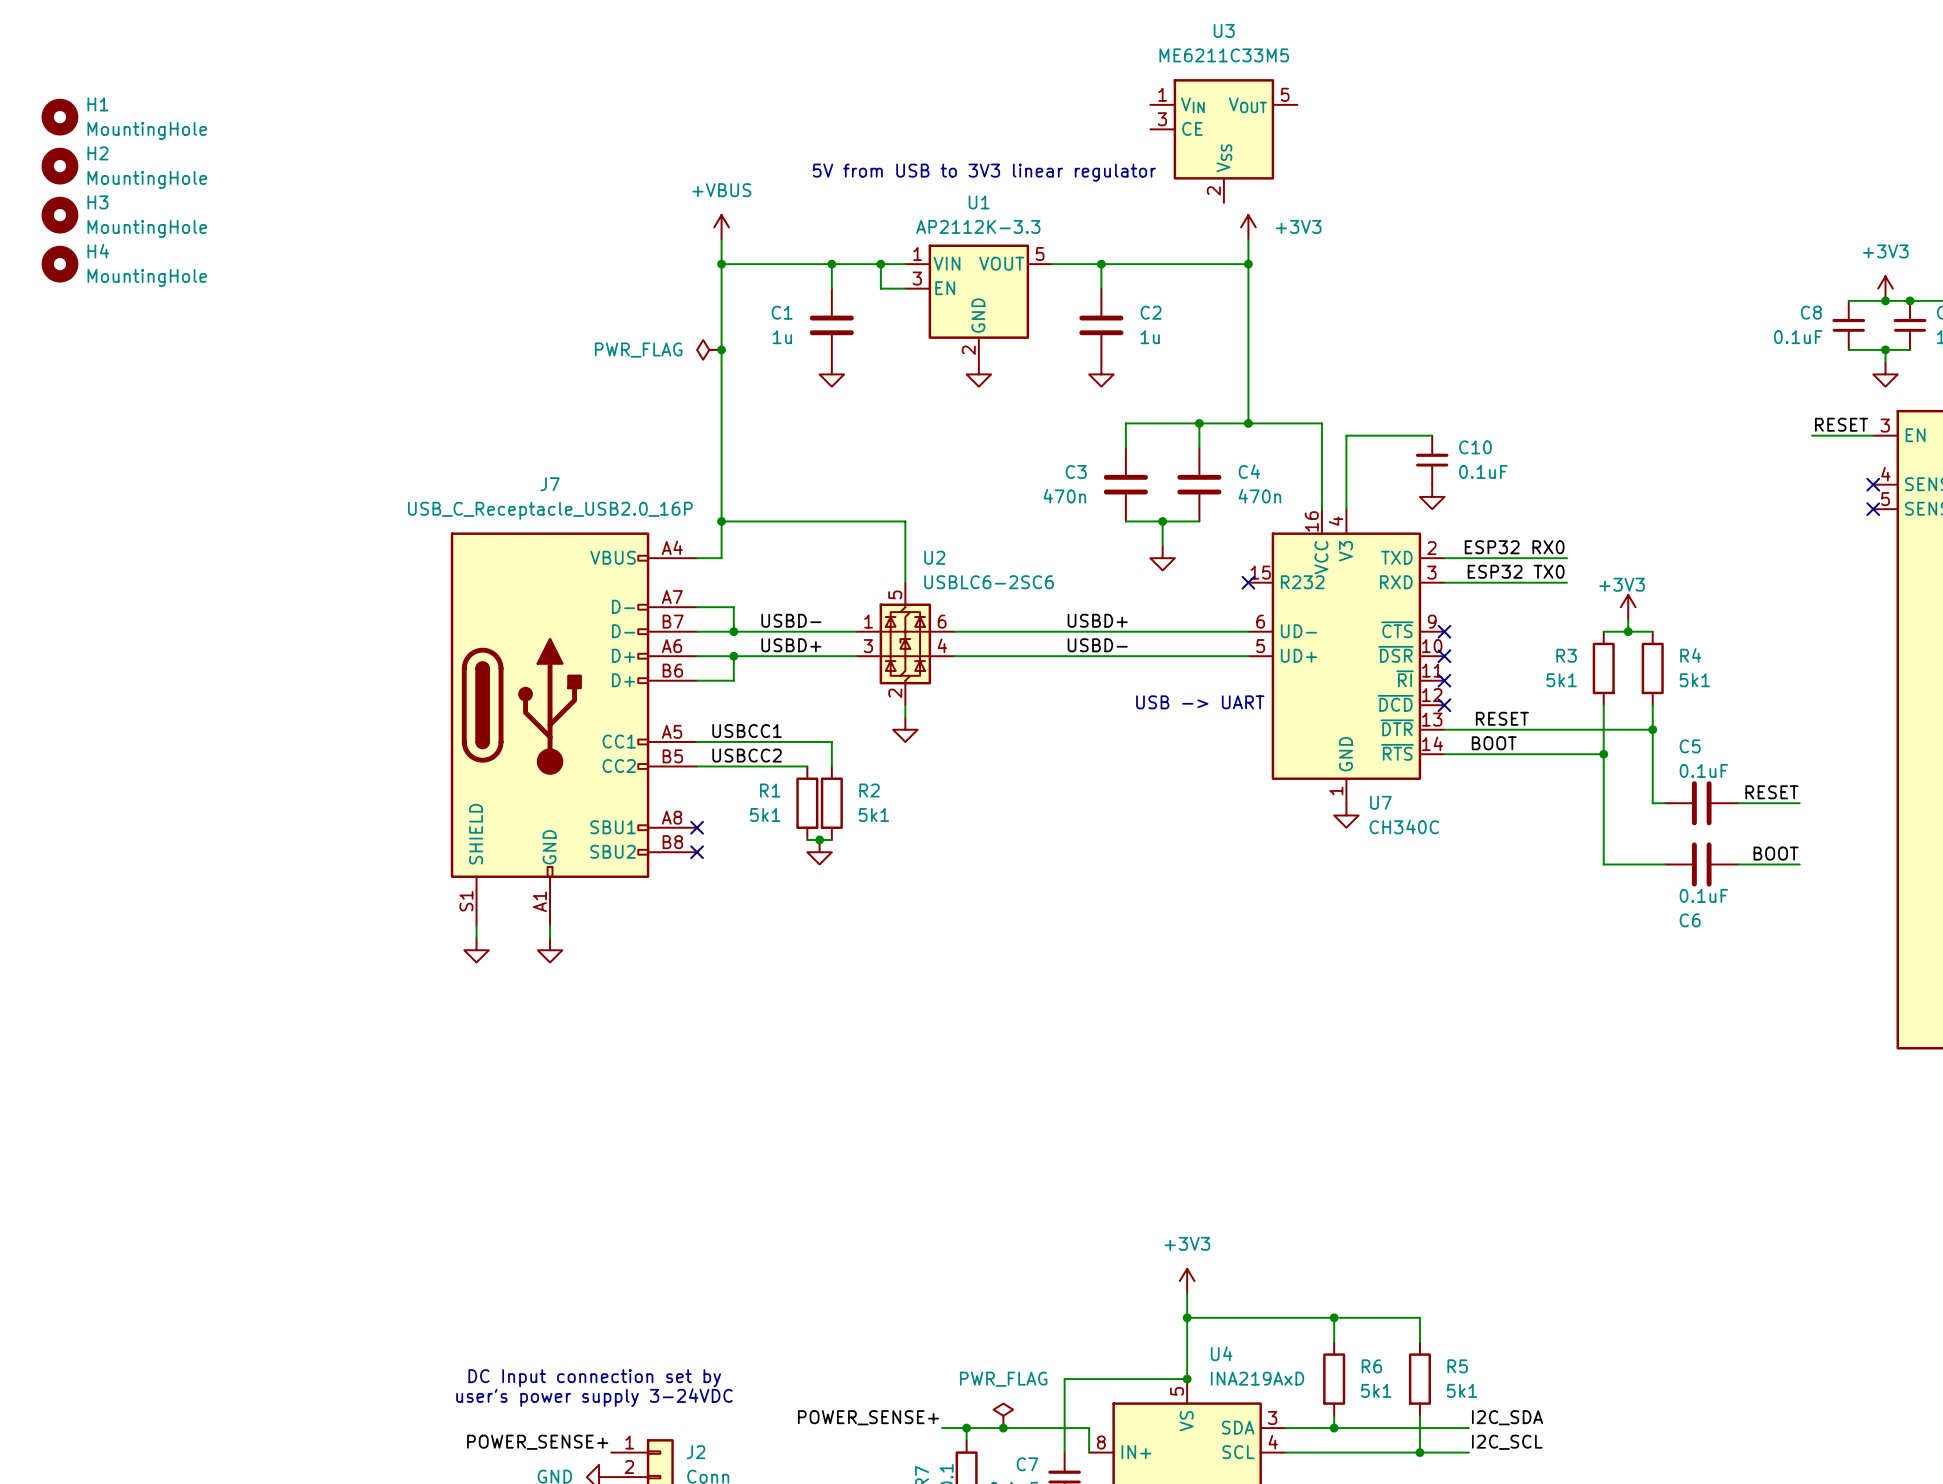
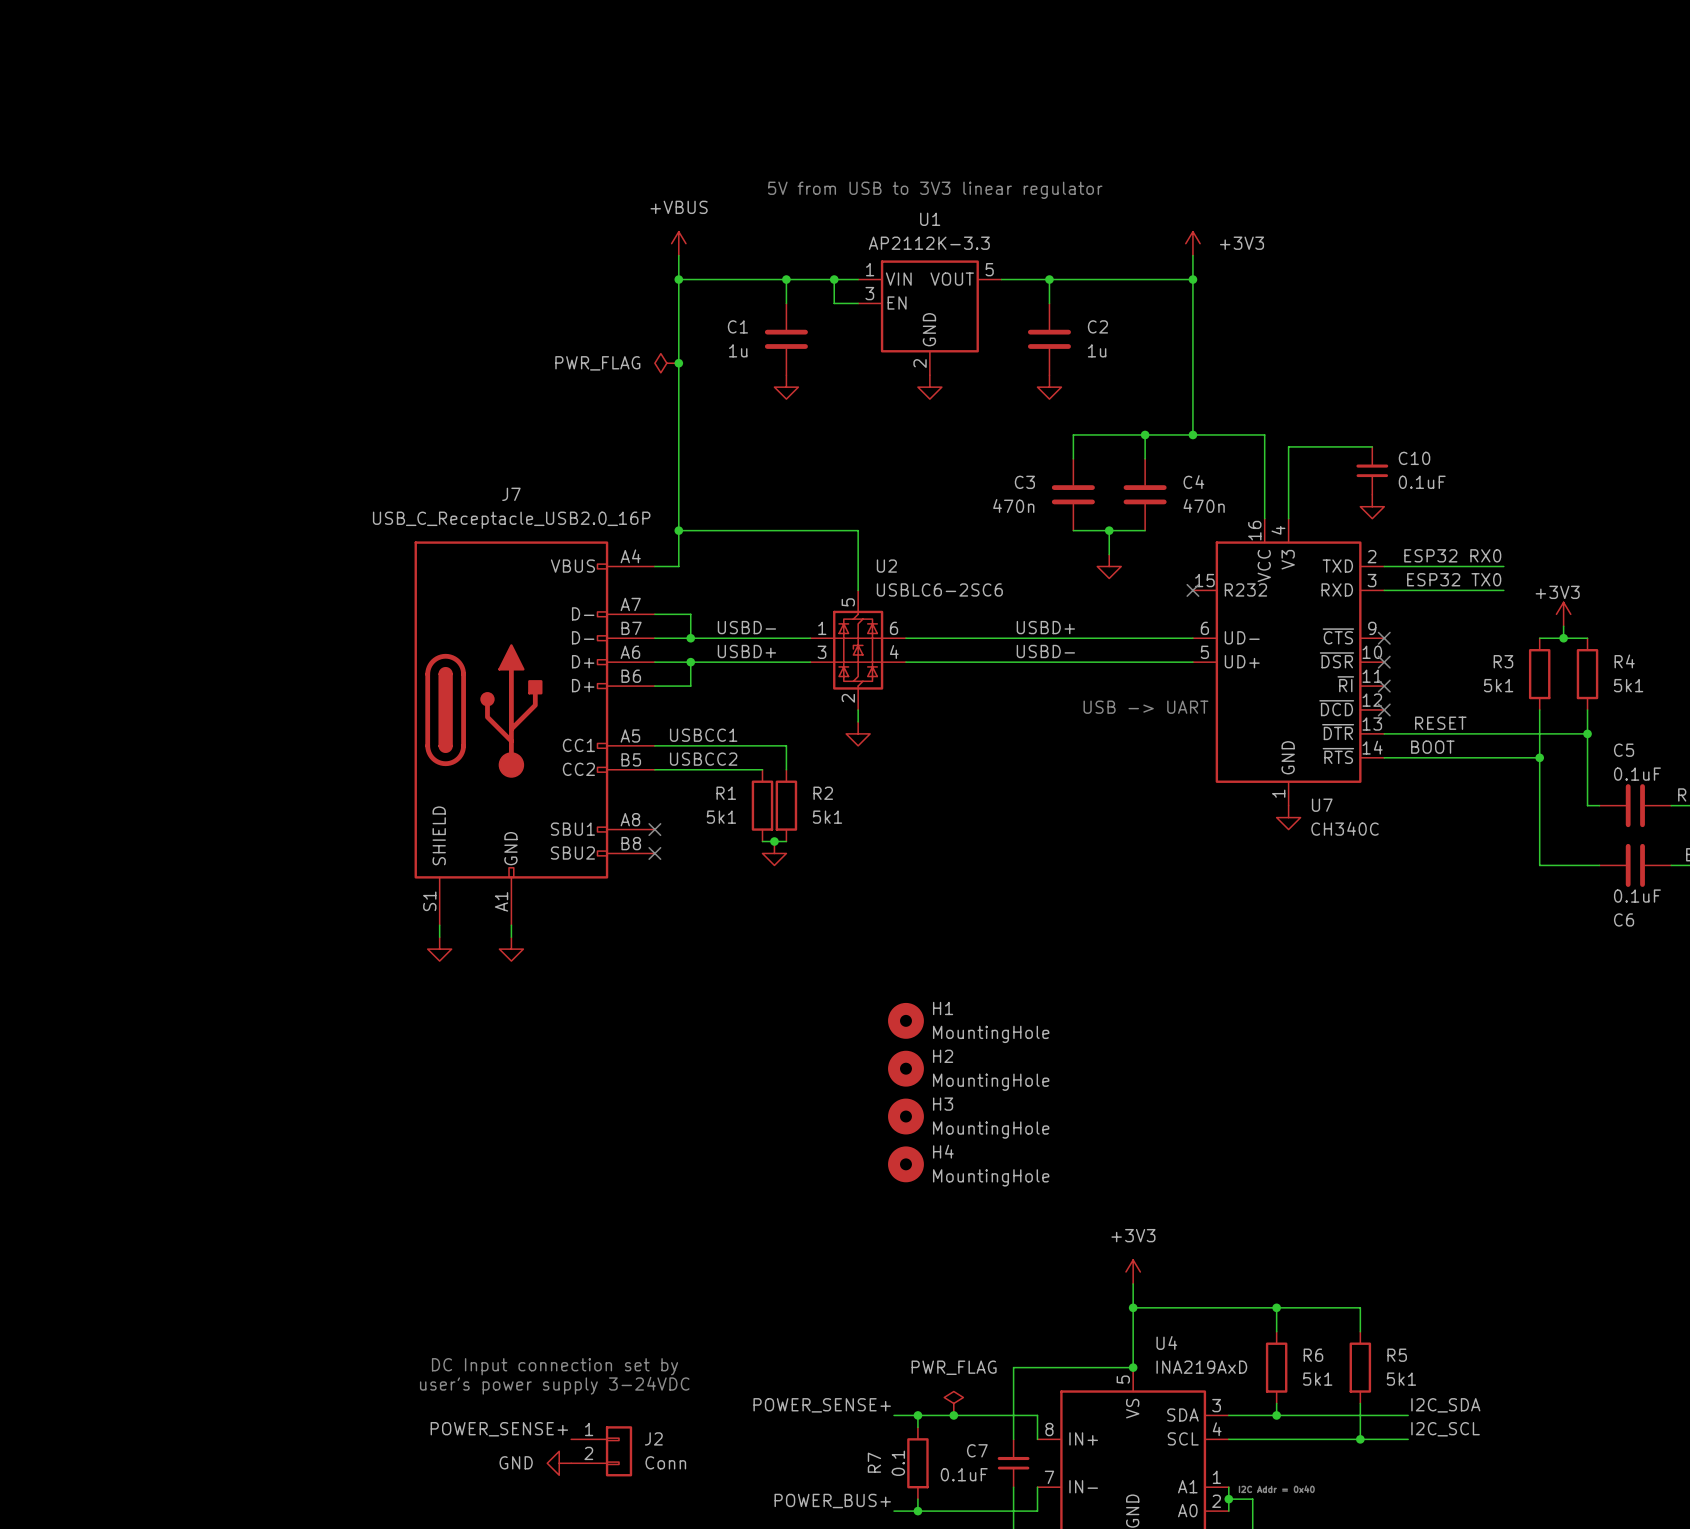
H1 position: (59, 117) -> (905, 1020)
U3: ME6211C33M5 (1223, 141) -> none
H2 position: (59, 166) -> (905, 1068)
H3 position: (59, 215) -> (905, 1116)
H4 position: (59, 264) -> (905, 1164)

